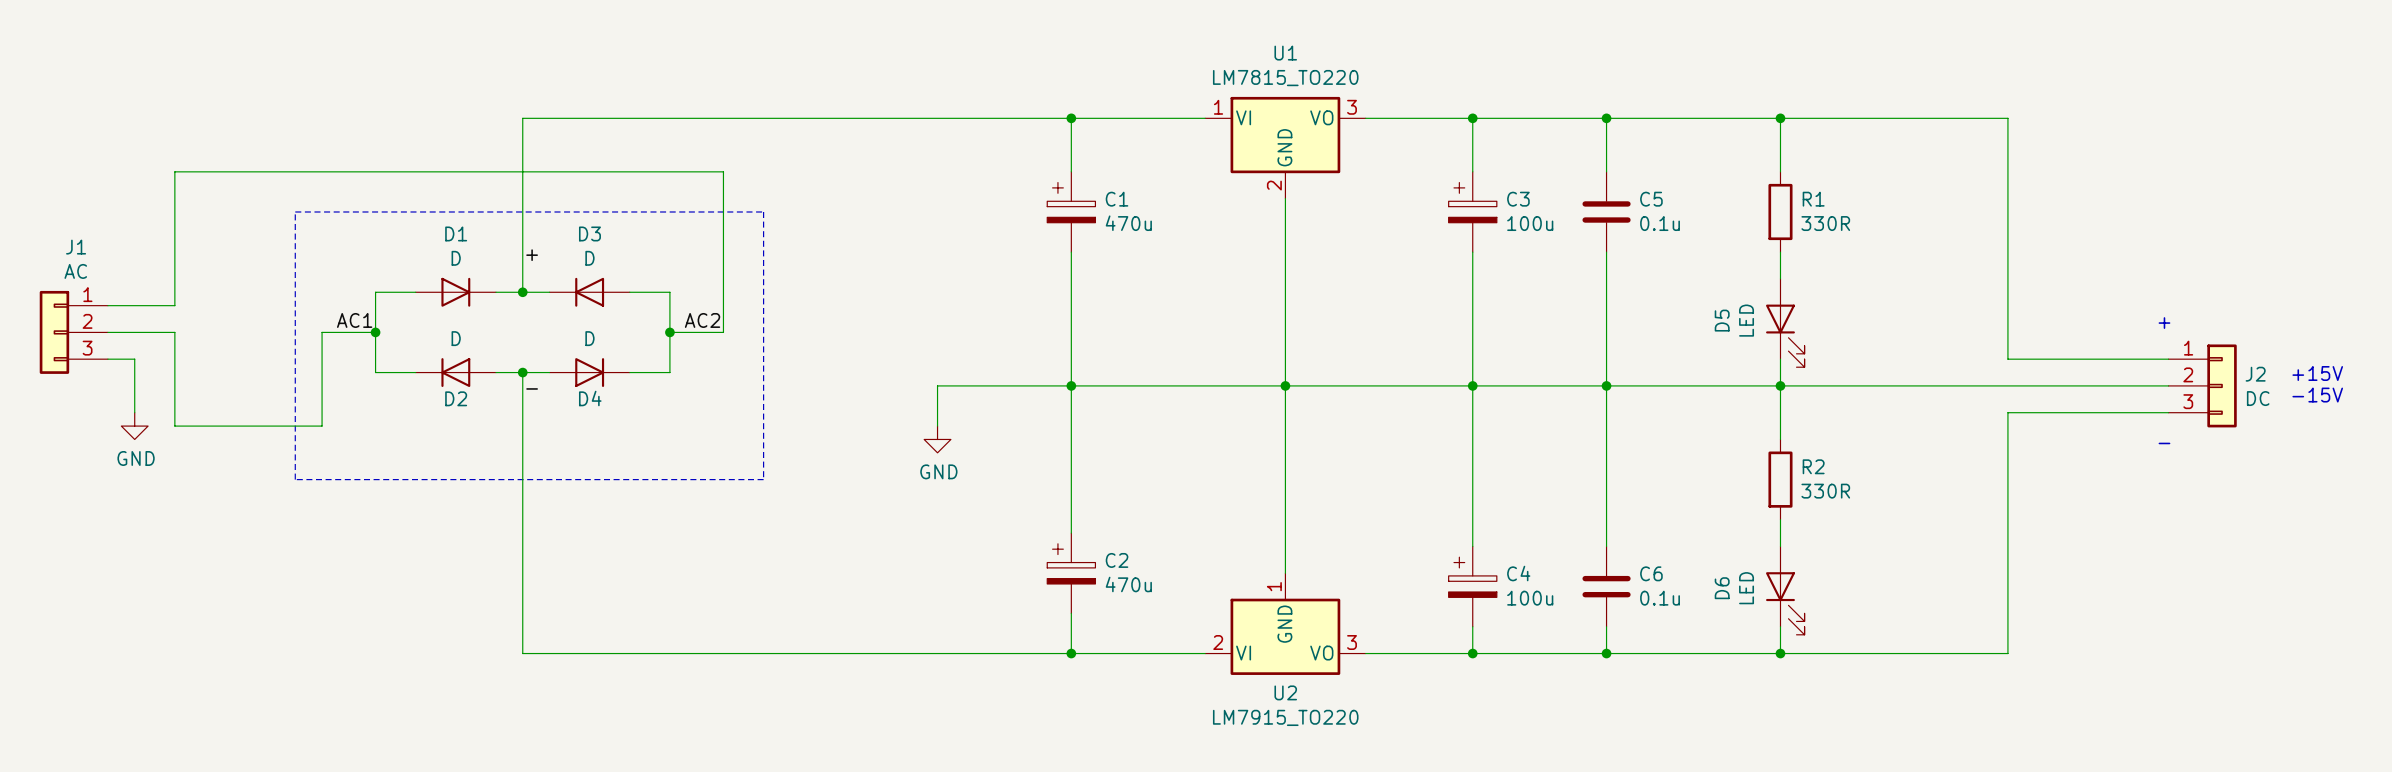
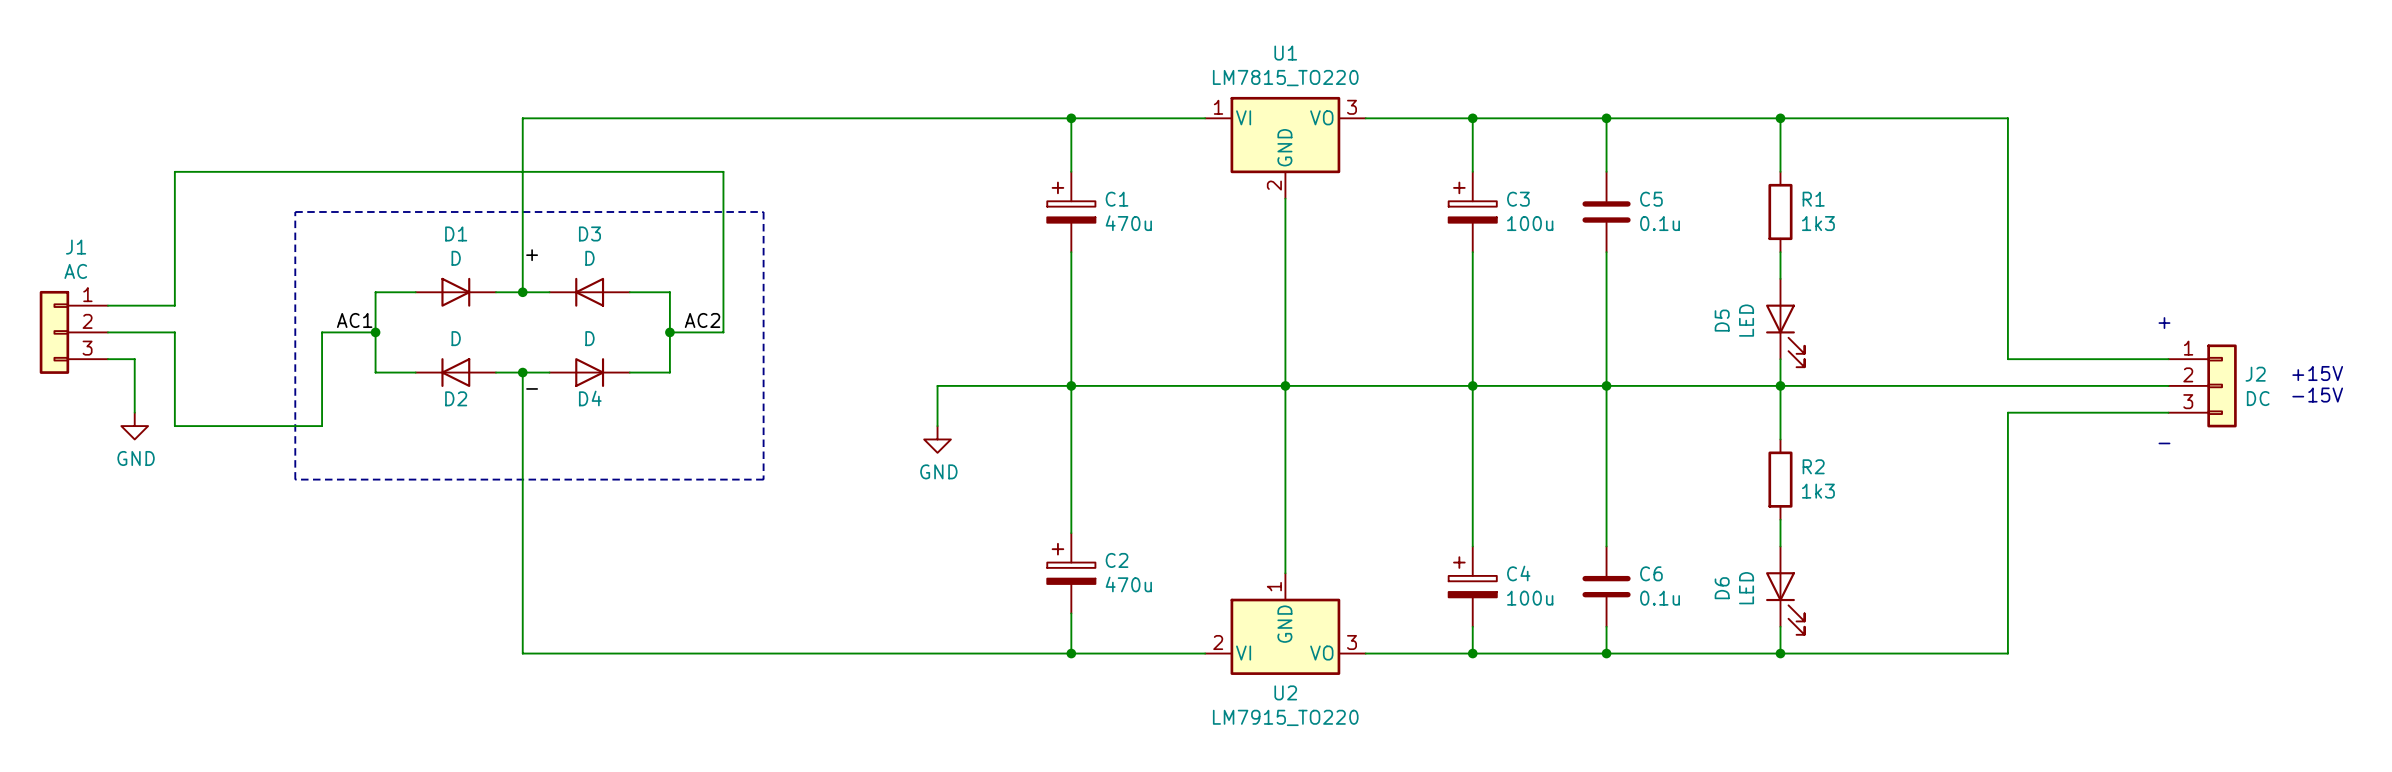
R1 value: 330R (1825, 223) -> 1k3 (1818, 223)
R2 value: 330R (1825, 491) -> 1k3 (1818, 491)

